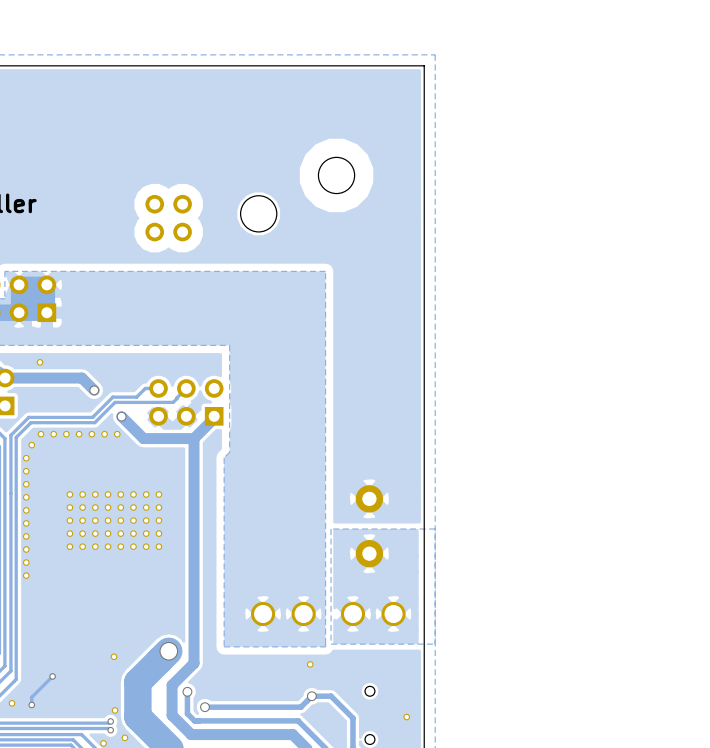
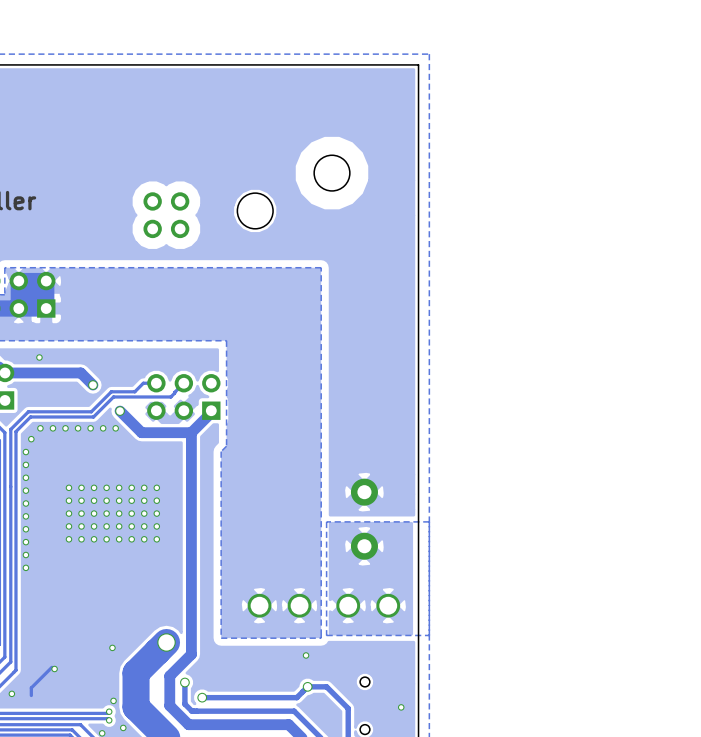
via: (52, 676) -> none
part: none -> (54, 668)
via: (31, 704) -> none

